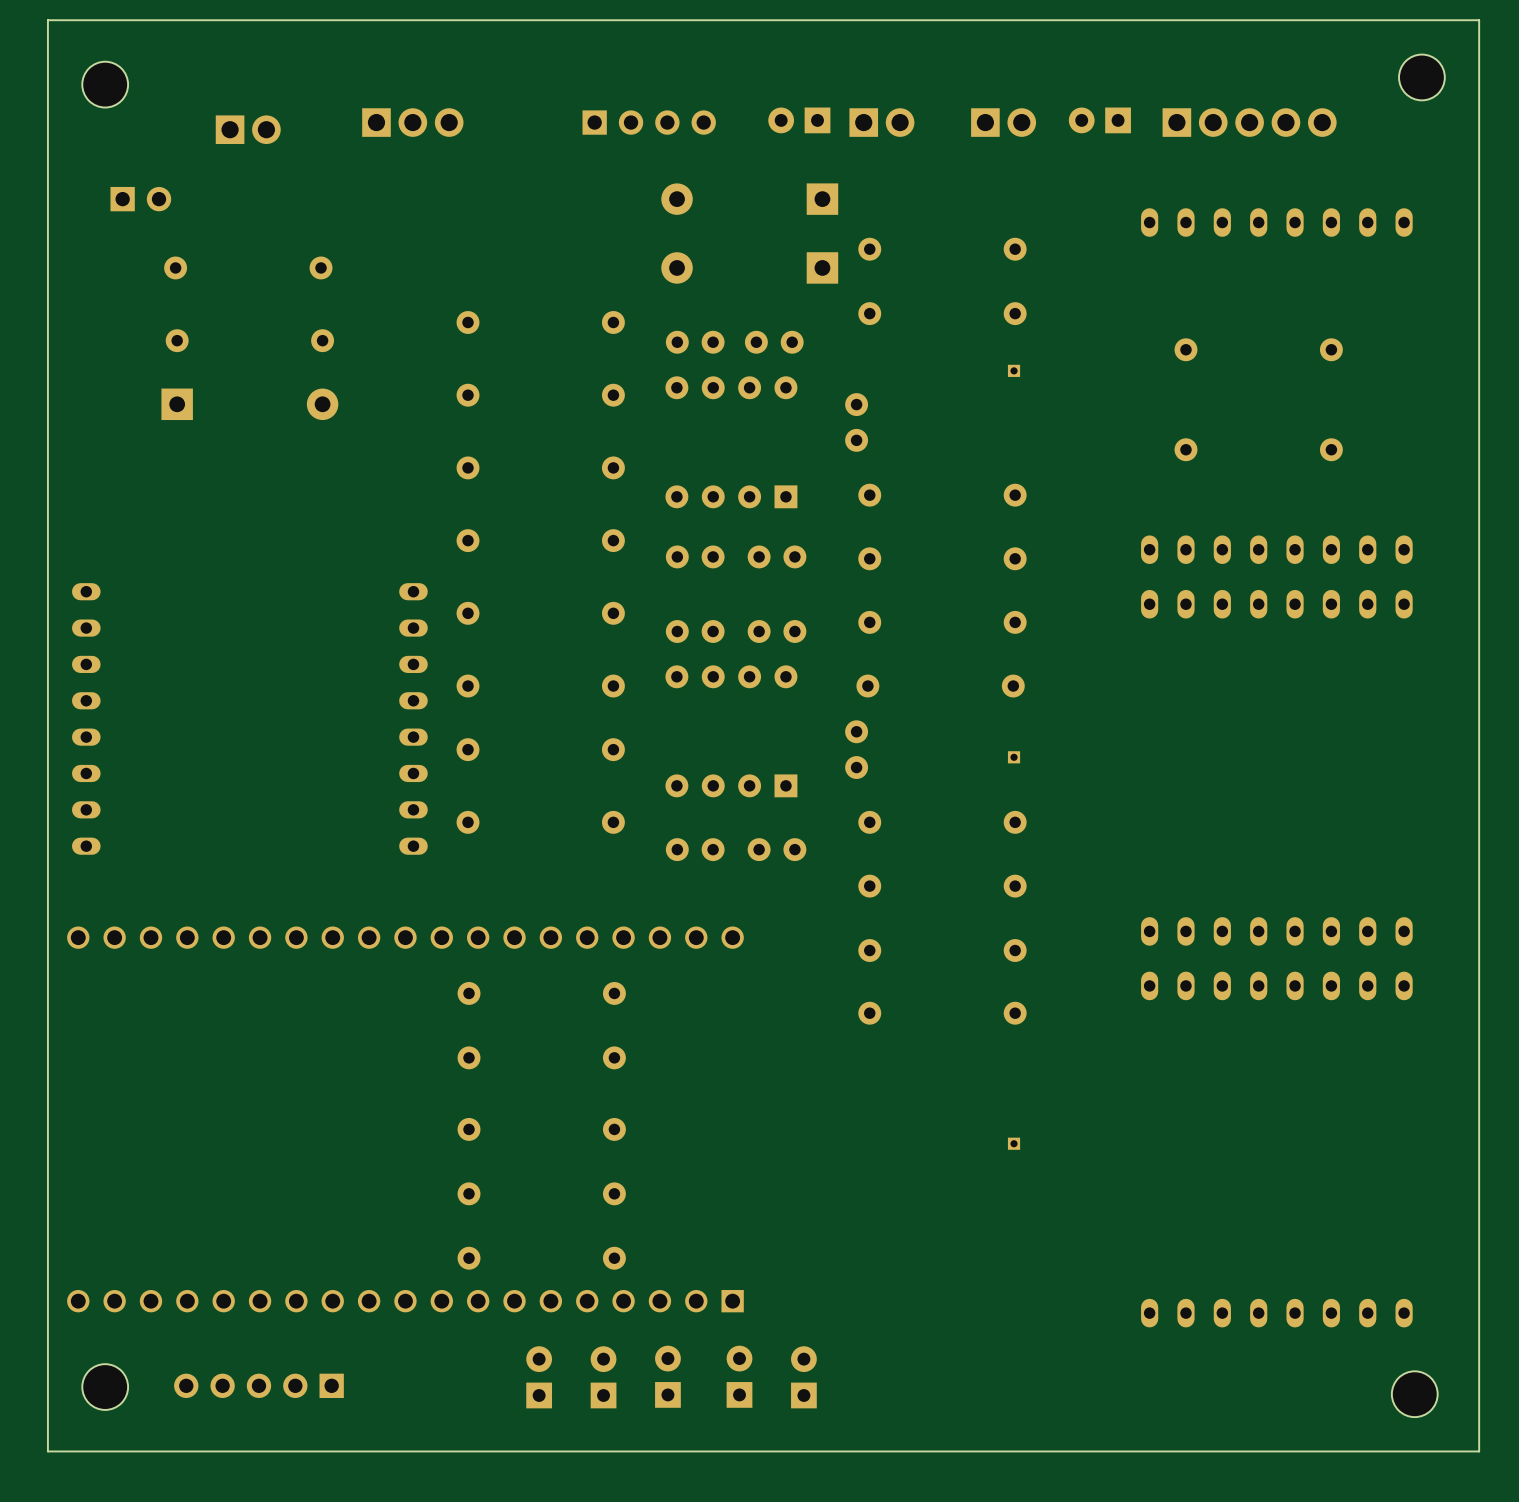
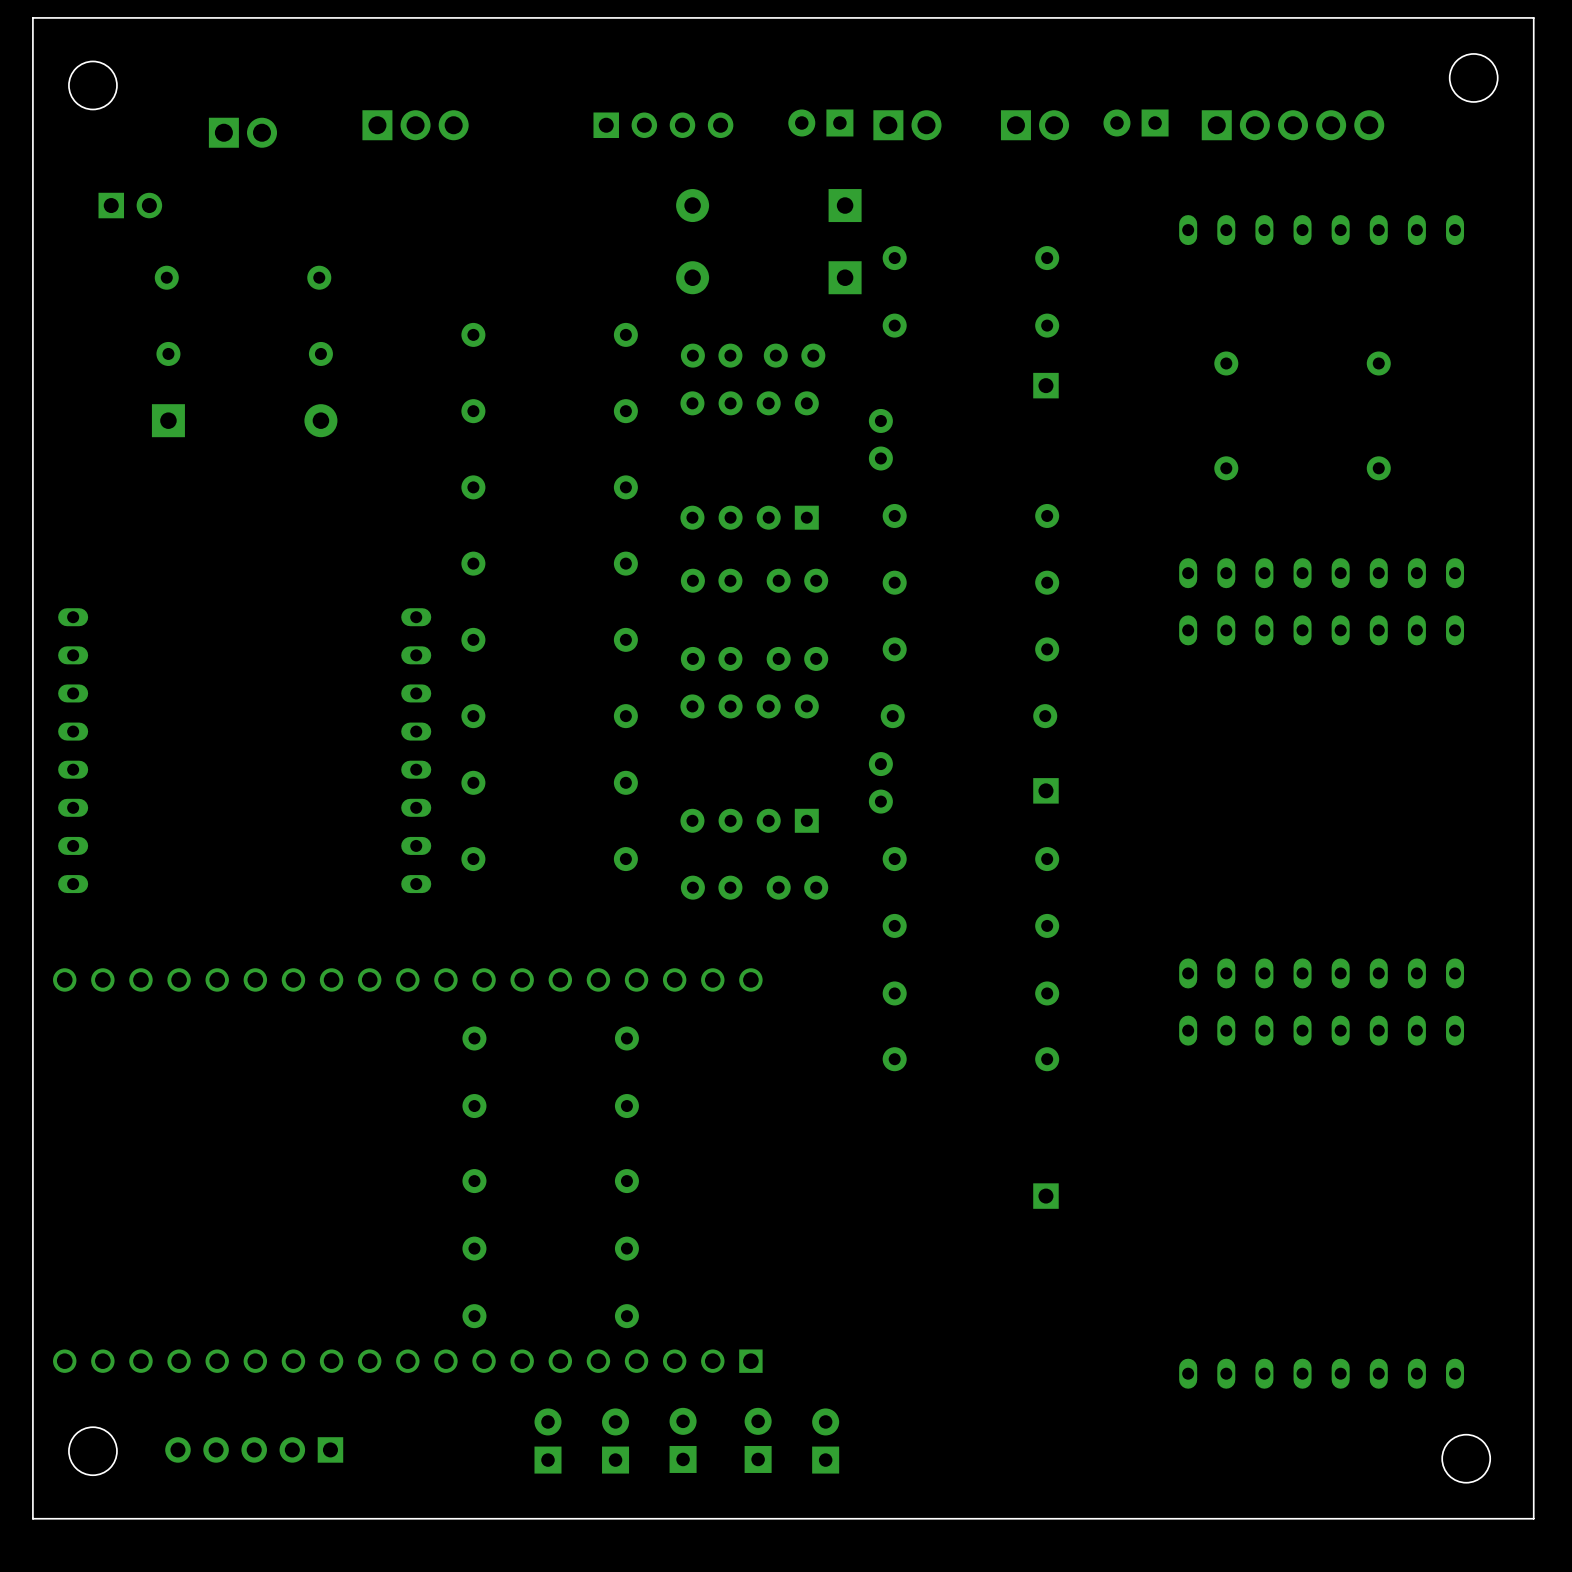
part footprint: [1007, 364, 1021, 377] -> [1033, 372, 1059, 399]
part footprint: [1007, 751, 1021, 764] -> [1033, 778, 1059, 804]
part footprint: [1007, 1137, 1021, 1150] -> [1033, 1183, 1059, 1209]

